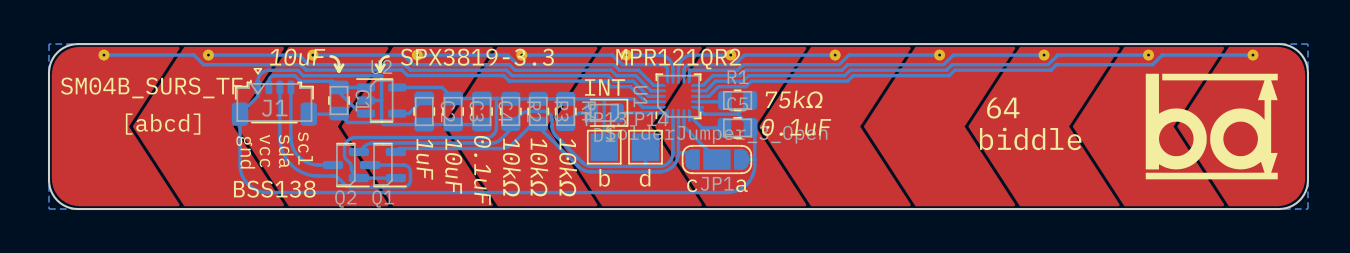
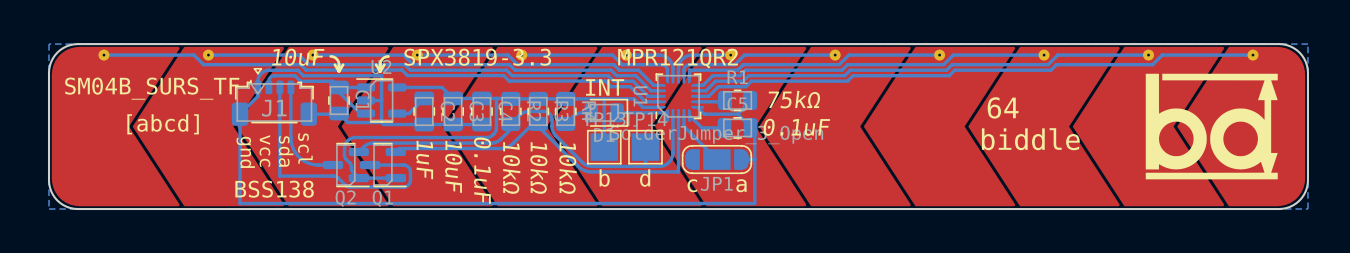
bottom track: (279, 137) (283, 154) (291, 164) (305, 173) (318, 176) -> (279, 137) (279, 176) (318, 176)
bottom track: (692, 159) (685, 152) (678, 152) (672, 166) (659, 171) -> (678, 152) (678, 171) (659, 171)
bottom track: (754, 165) (752, 176) (746, 184) (739, 189) (727, 192) (264, 192) (252, 188) (246, 182) (241, 174) (240, 165) -> (754, 165) (754, 203) (240, 203) (240, 165)

